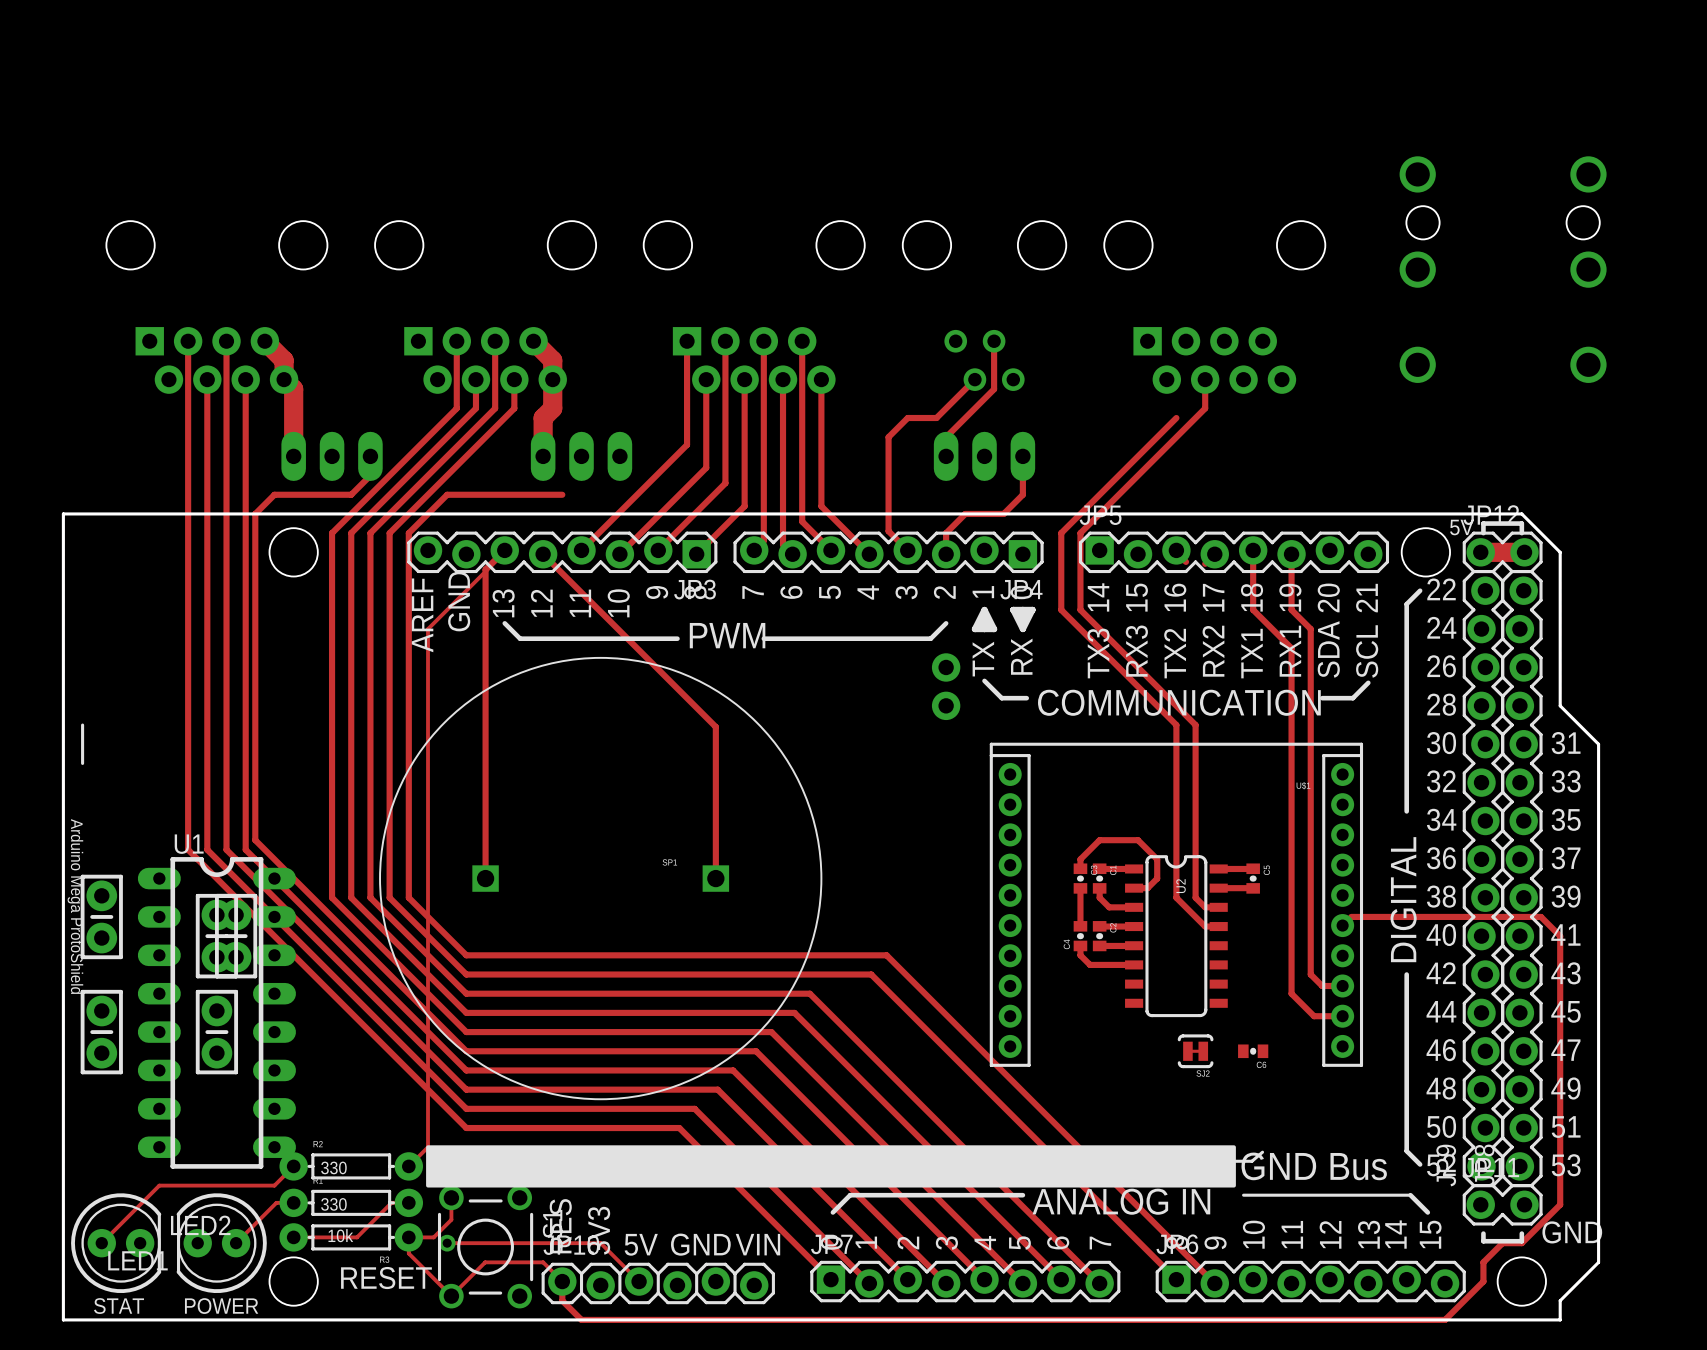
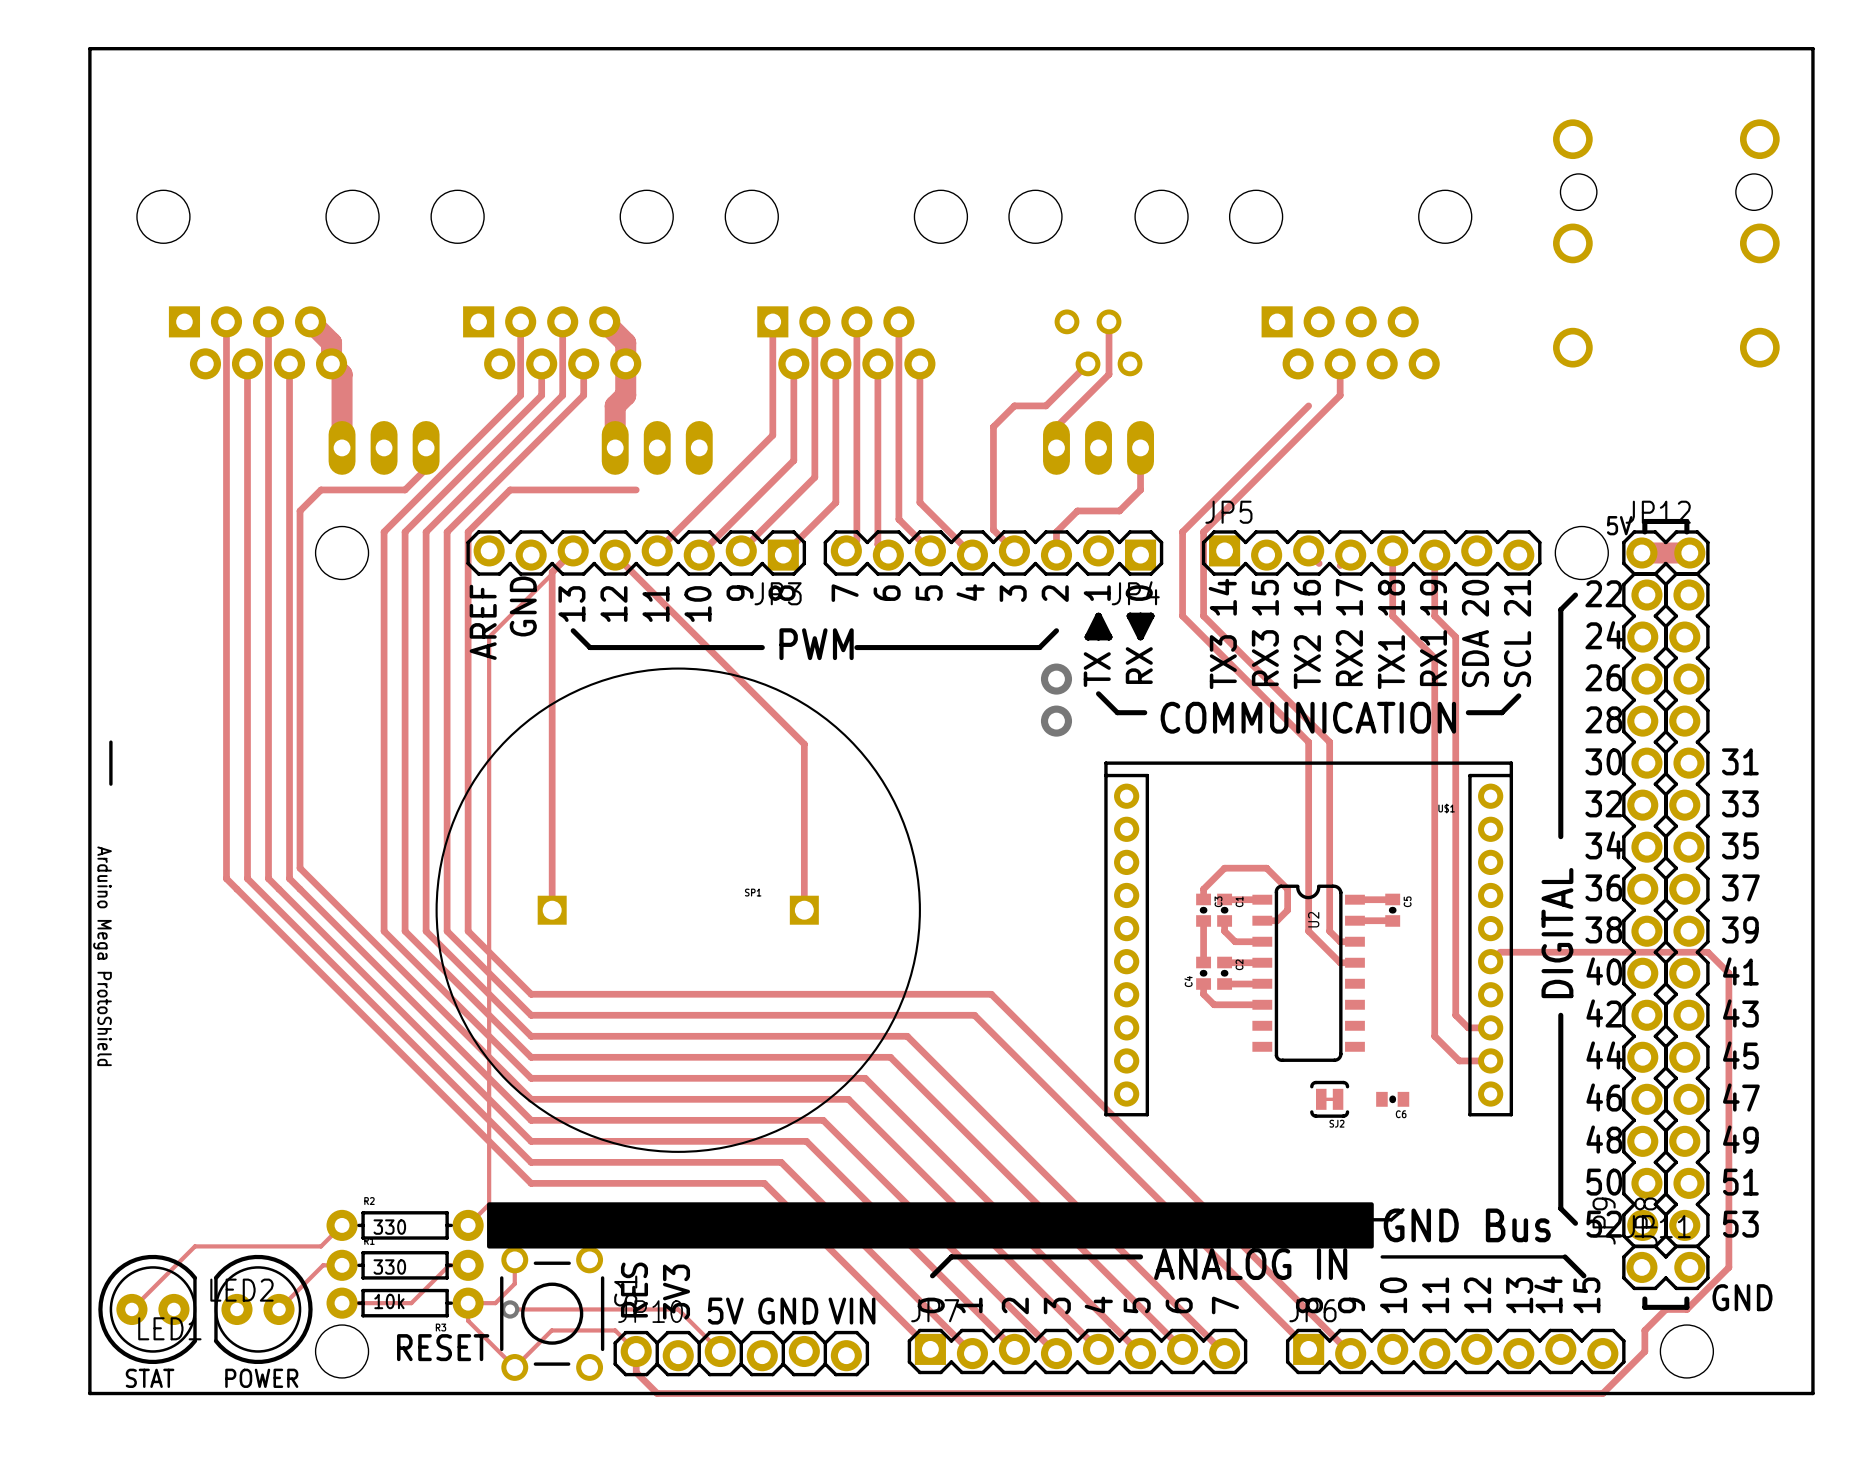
board edge: (63, 513) (1521, 513) (1560, 552) (1560, 705) (1598, 744) (1598, 1262) (1560, 1300) (1560, 1319) -> (89, 510) (89, 48) (1812, 48) (1812, 1393) (1728, 1393)
part: (101, 916) -> none
part: (216, 936) -> none
part: (236, 936) -> none
U1: (216, 1012) -> none
part: (101, 1032) -> none
part: (216, 1032) -> none

